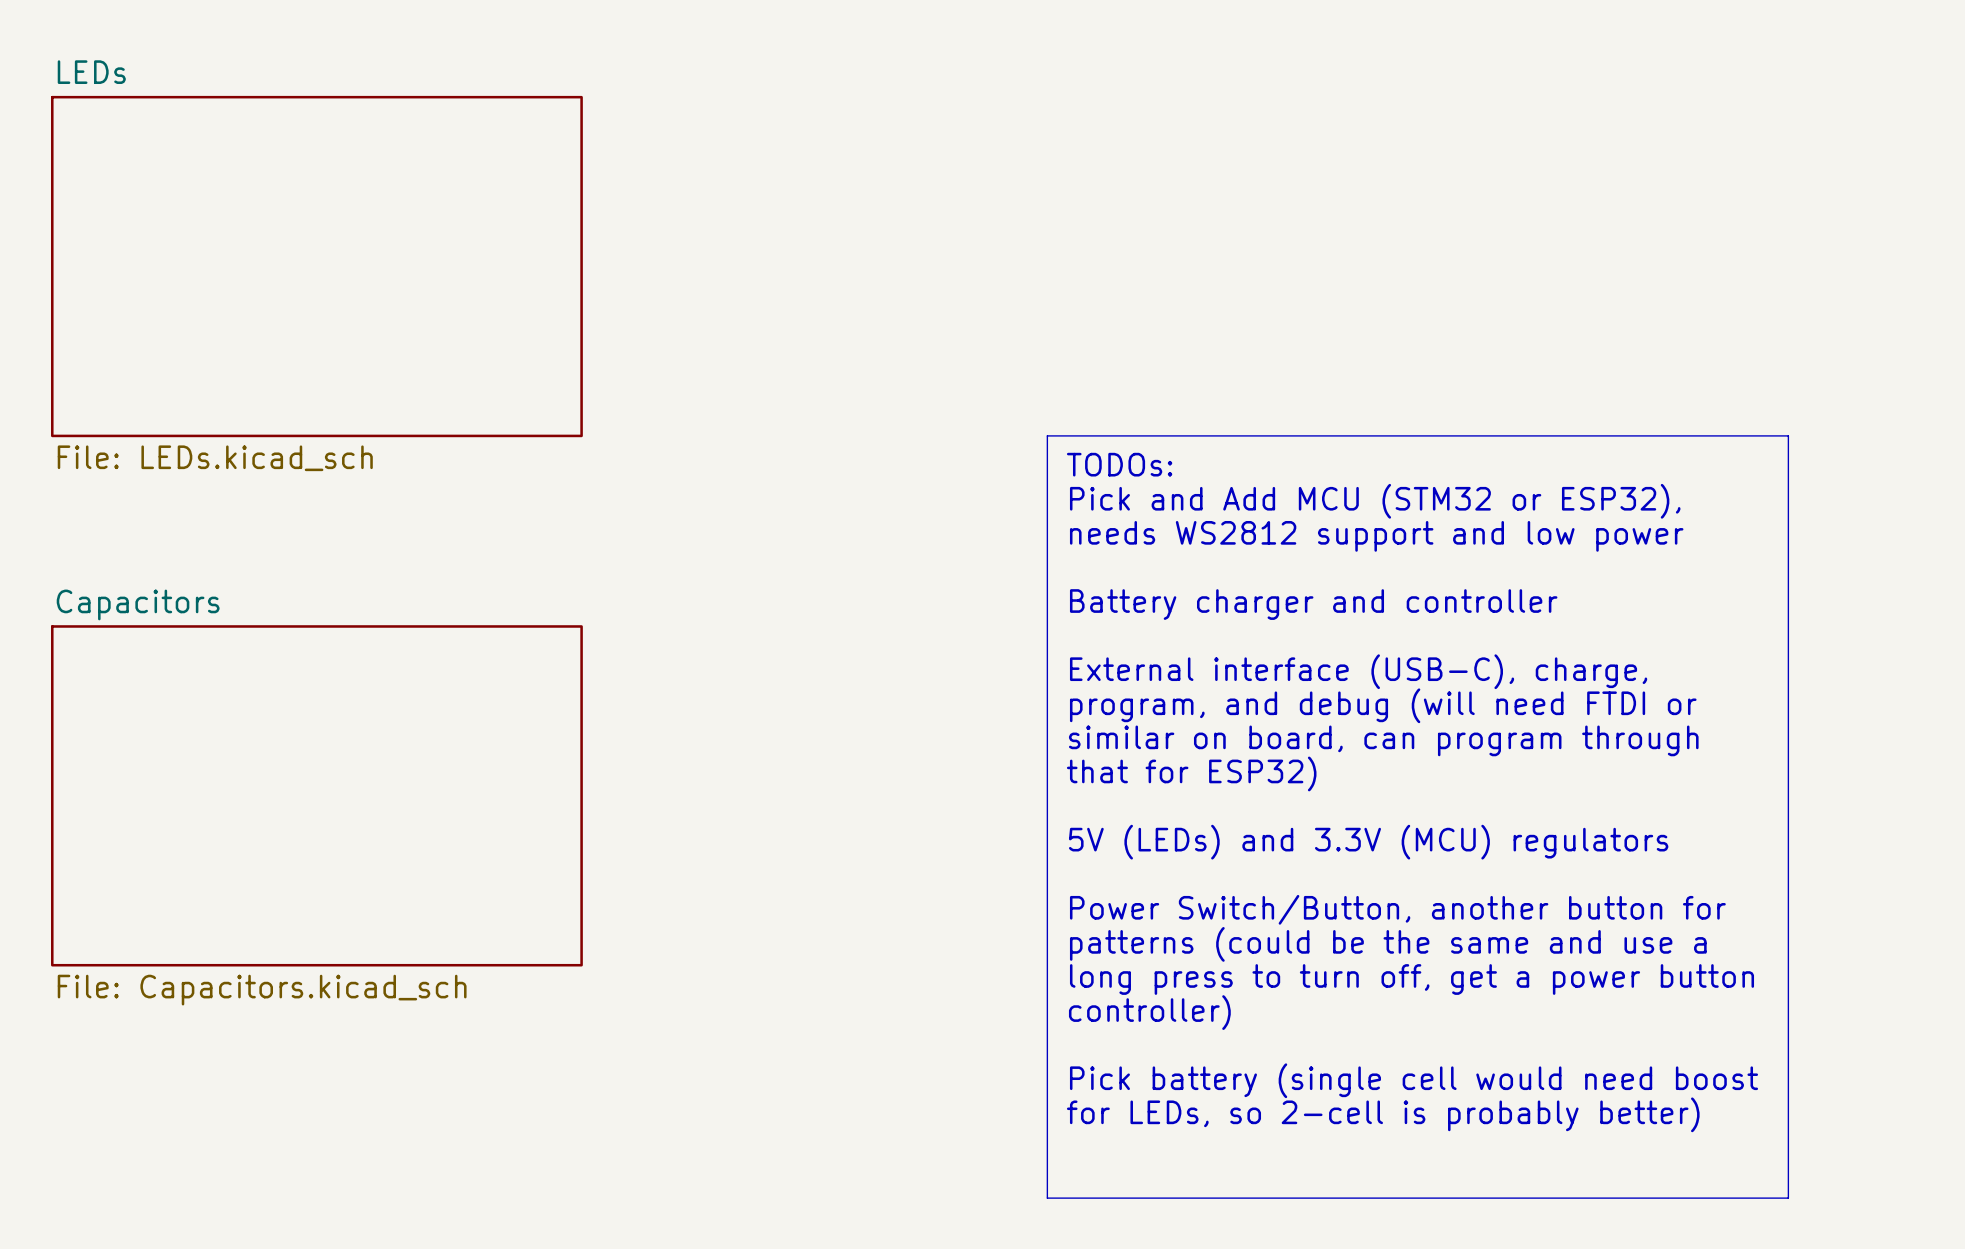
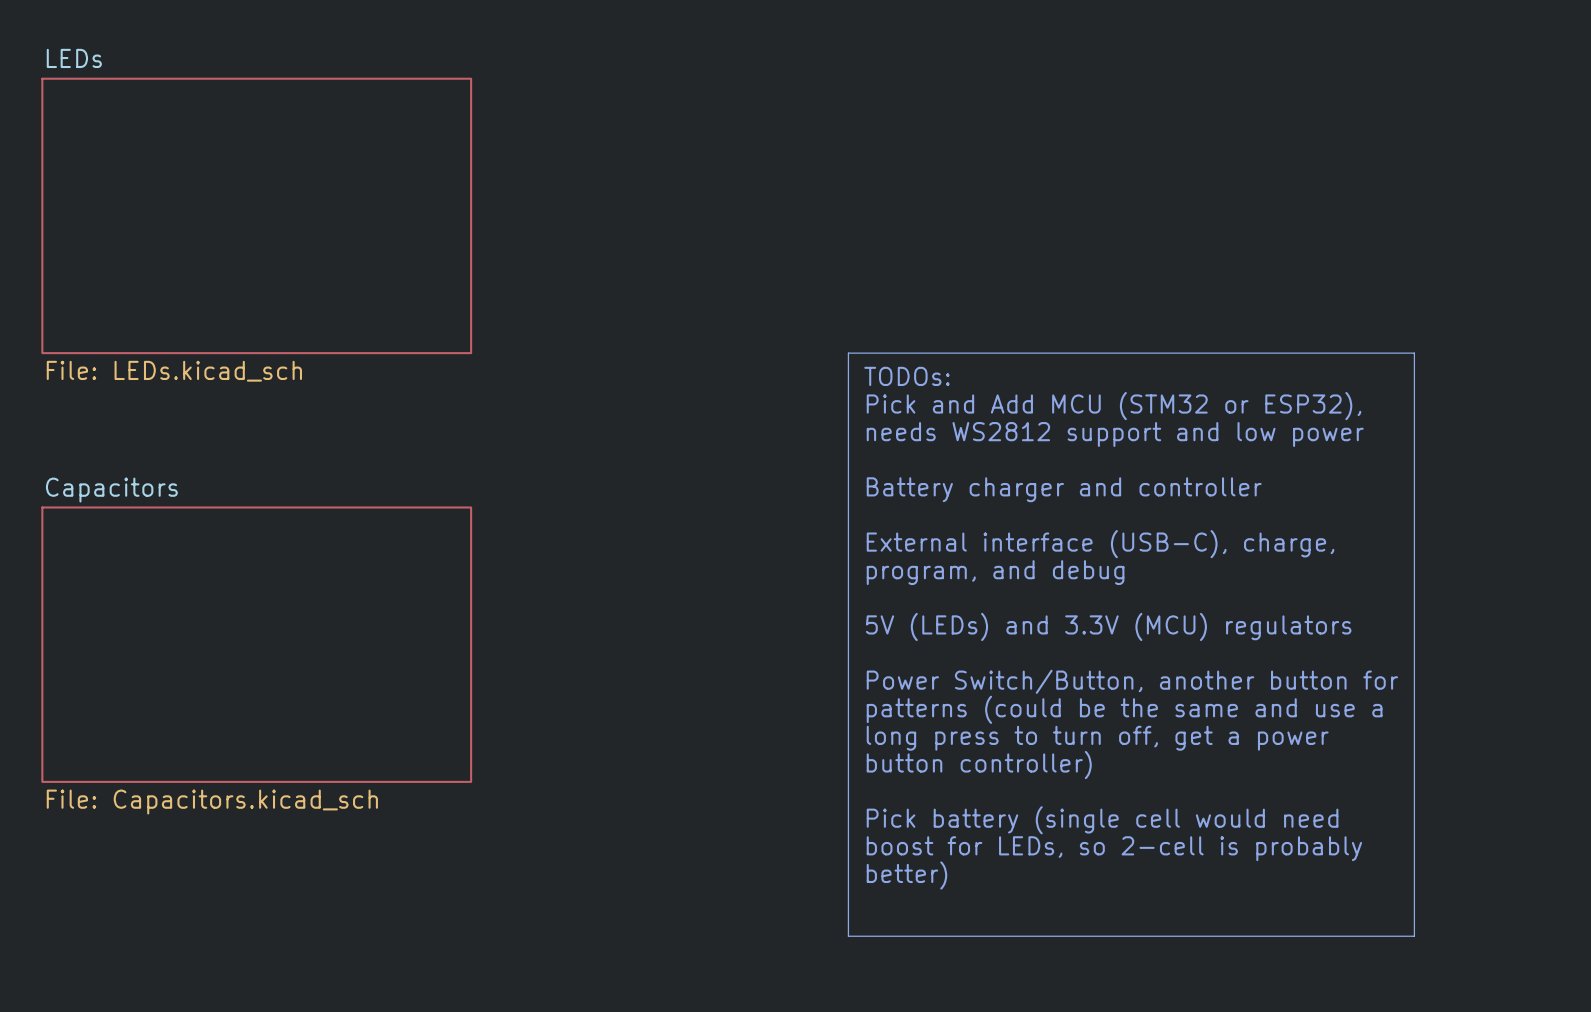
line: (1746, 435) (1788, 435) (1788, 1198) (1047, 1198) (1047, 1155) -> (1414, 353) (1414, 936) (848, 936)
text: program, and debug (will need FTDI or (1383, 705) -> program, and debug (995, 572)
text: similar on board, can program through (1383, 740) -> none
text: that for ESP32) (1191, 773) -> 5V (LEDs) and 3.3V (MCU) regulators (1108, 626)
text: 5V (LEDs) and 3.3V (MCU) regulators (1368, 842) -> Power Switch/Button, another button for (1132, 681)
text: none -> patterns (could be the same and use a (1124, 709)
text: Power Switch/Button, another button for (1397, 909) -> long press to turn off, get a power (1097, 738)
text: patterns (could be the same and use a (1388, 944) -> button controller) (979, 765)
text: long press to turn off, get a power button (1411, 979) -> none
text: controller) (1149, 1012) -> Pick battery (single cell would need (1102, 820)
text: none -> boost for LEDs, so 2-cell is probably (1114, 848)
text: Pick battery (single cell would need boost (1414, 1080) -> better) (906, 875)
text: for LEDs, so 2-cell is probably better) (1383, 1114) -> none

